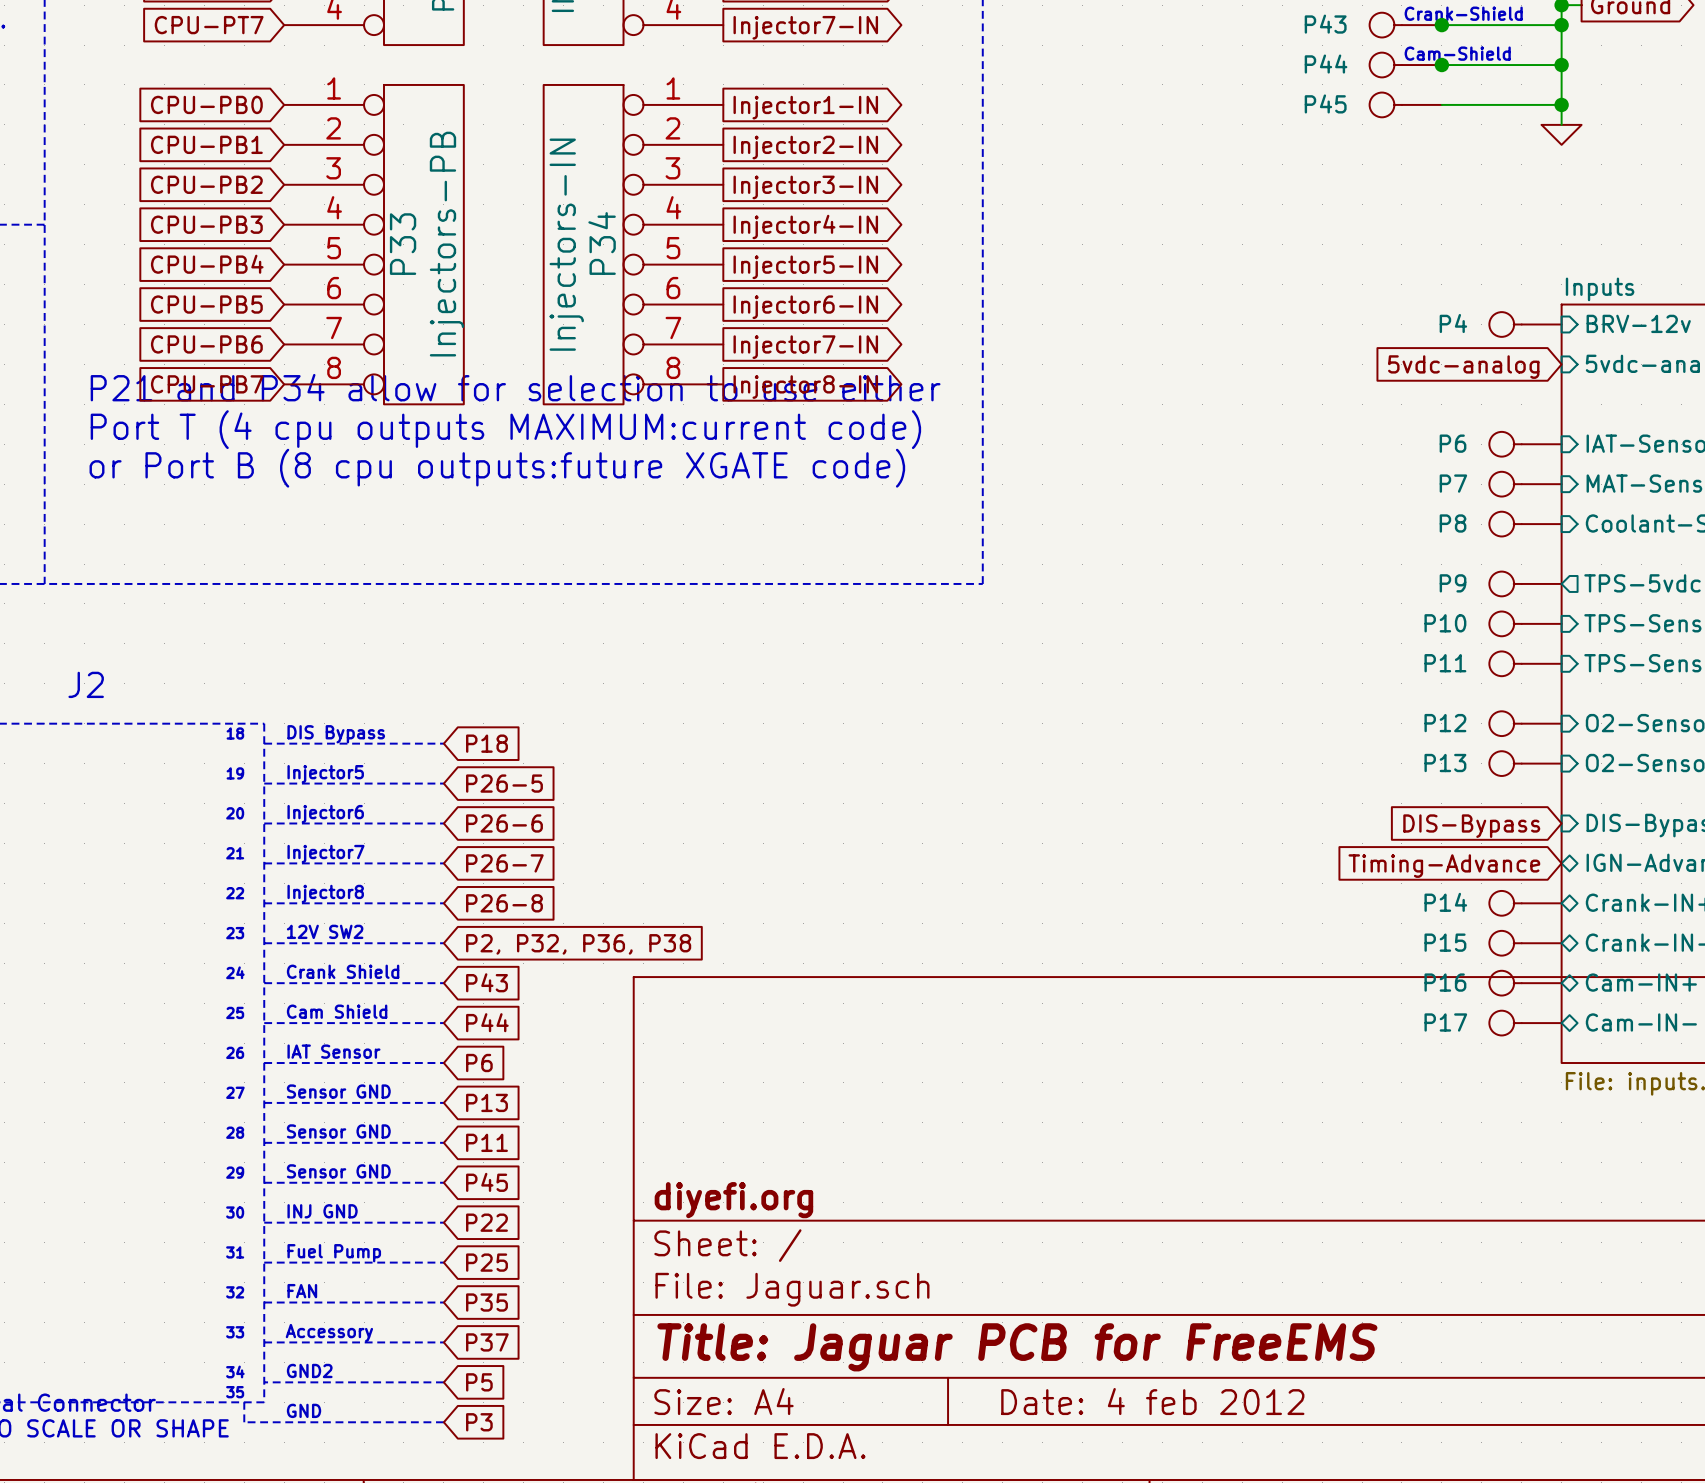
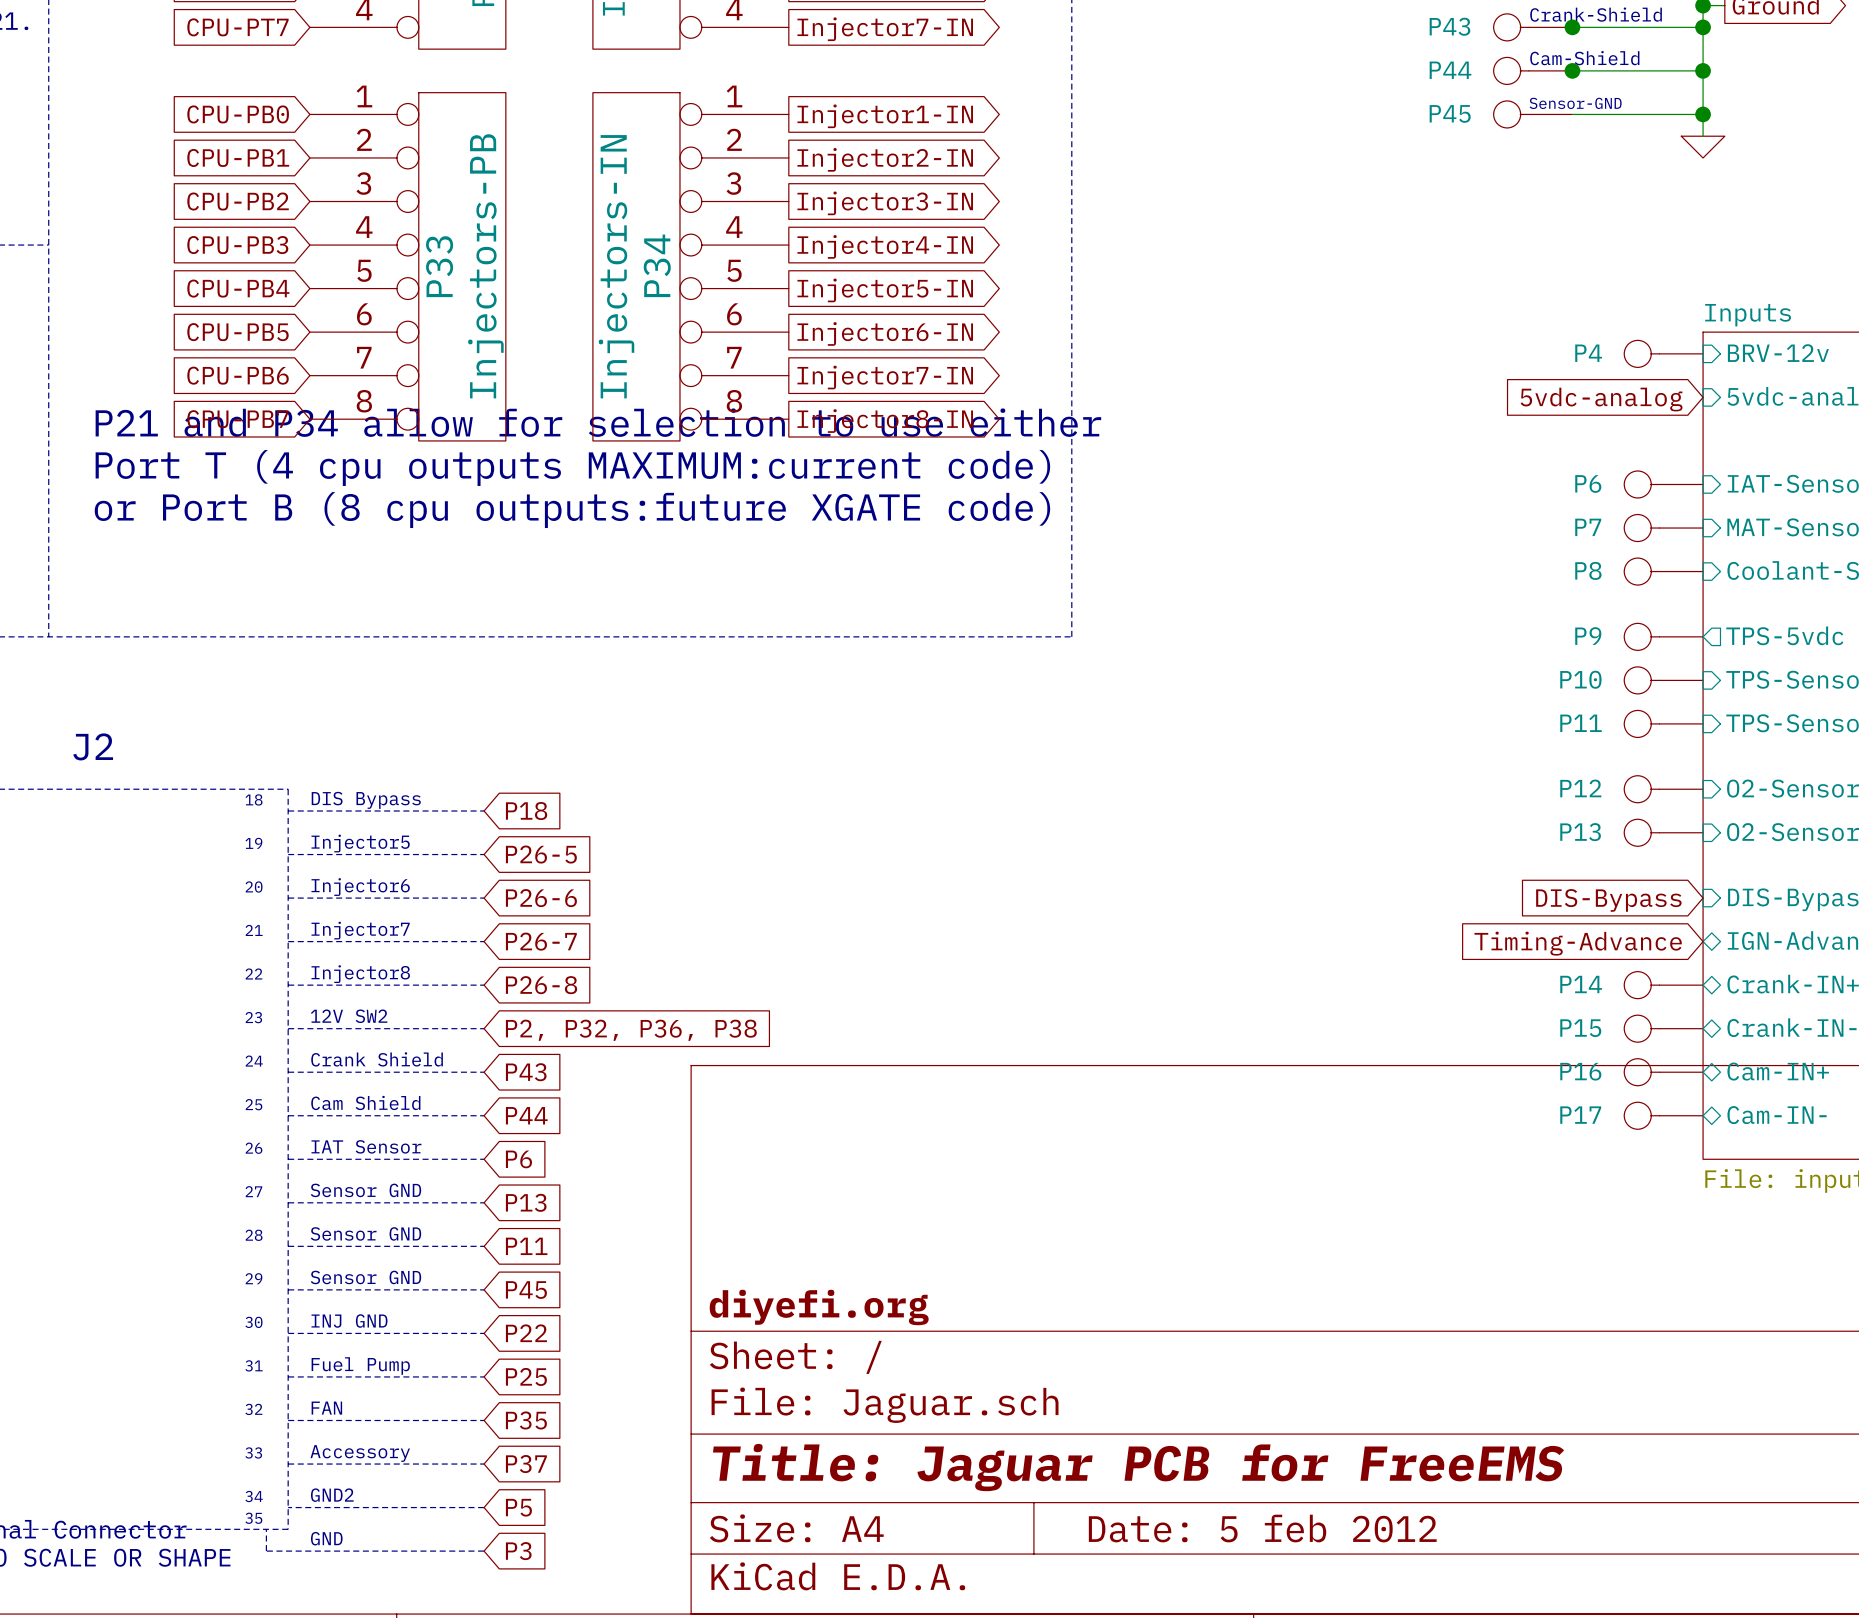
text: none -> Sensor-GND (1575, 103)
title block: Date: 4 feb 2012 (1152, 1401) -> Date: 5 feb 2012 (1262, 1528)

